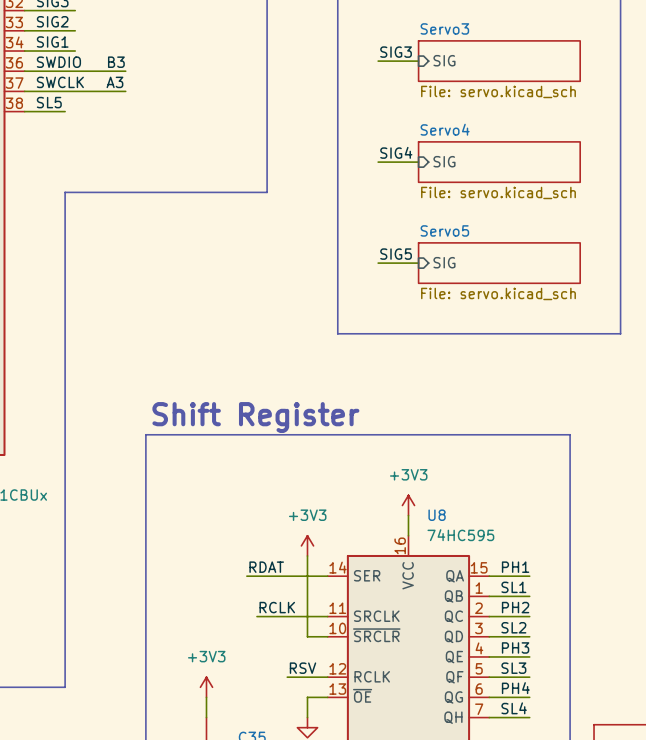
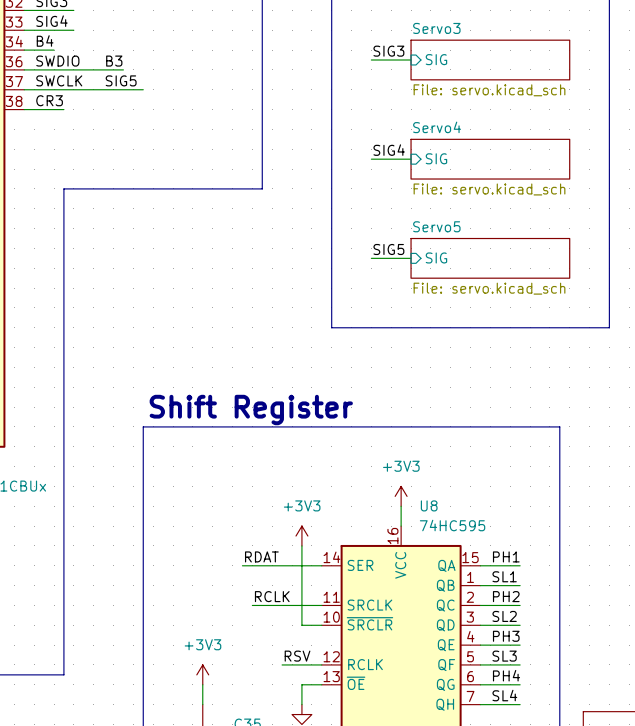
label: SIG2 (52, 21) -> SIG4 (51, 21)
label: SIG1 (52, 41) -> B4 (45, 41)
wire: (55, 51) (75, 51) -> (123, 89) (143, 89)
label: A3 (114, 82) -> SIG5 (121, 80)
label: SL5 (49, 102) -> CR3 (49, 100)

